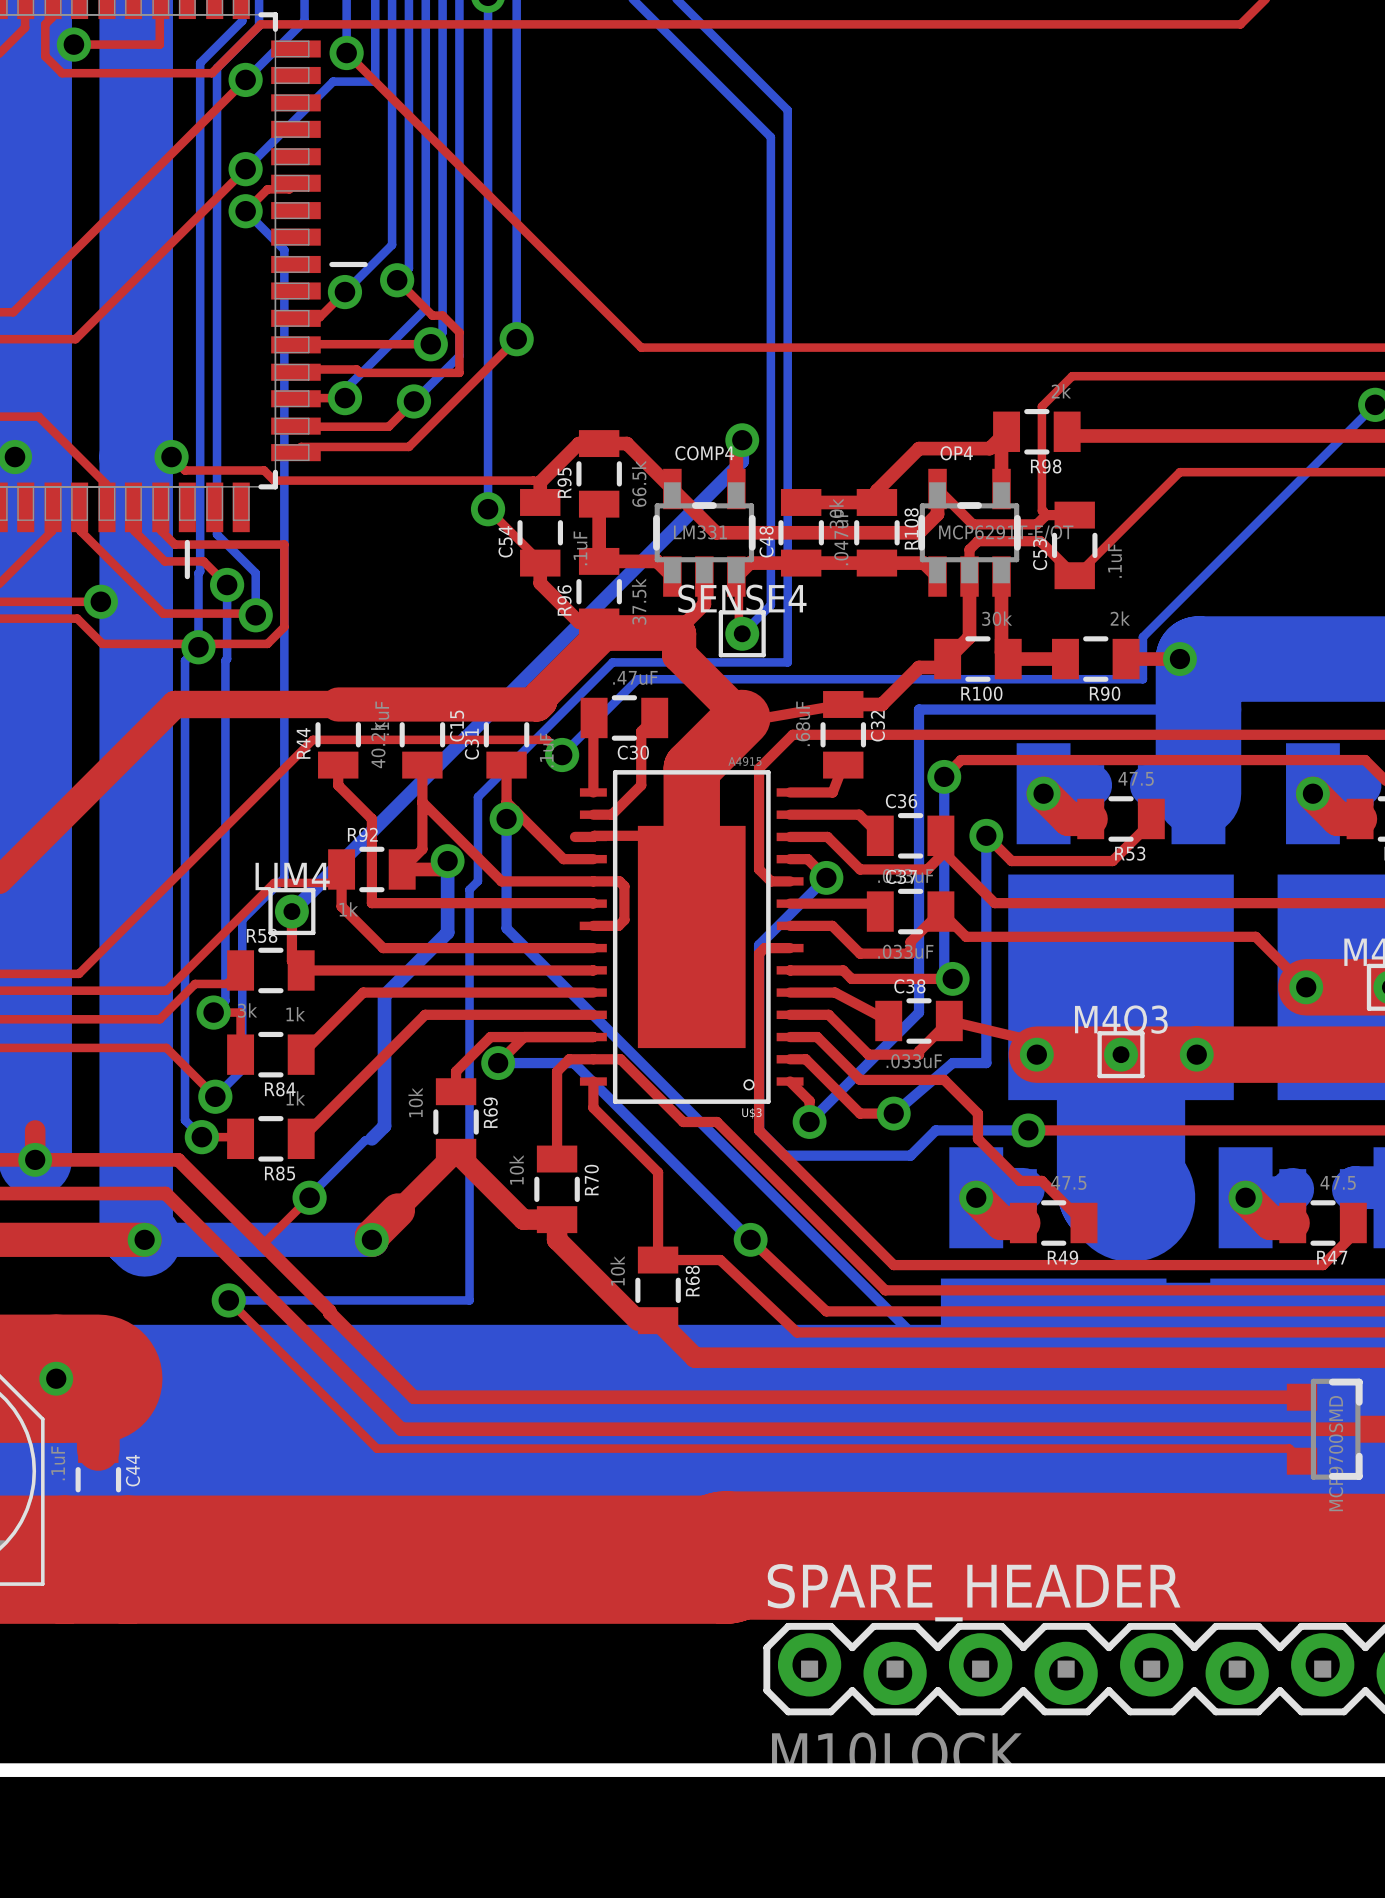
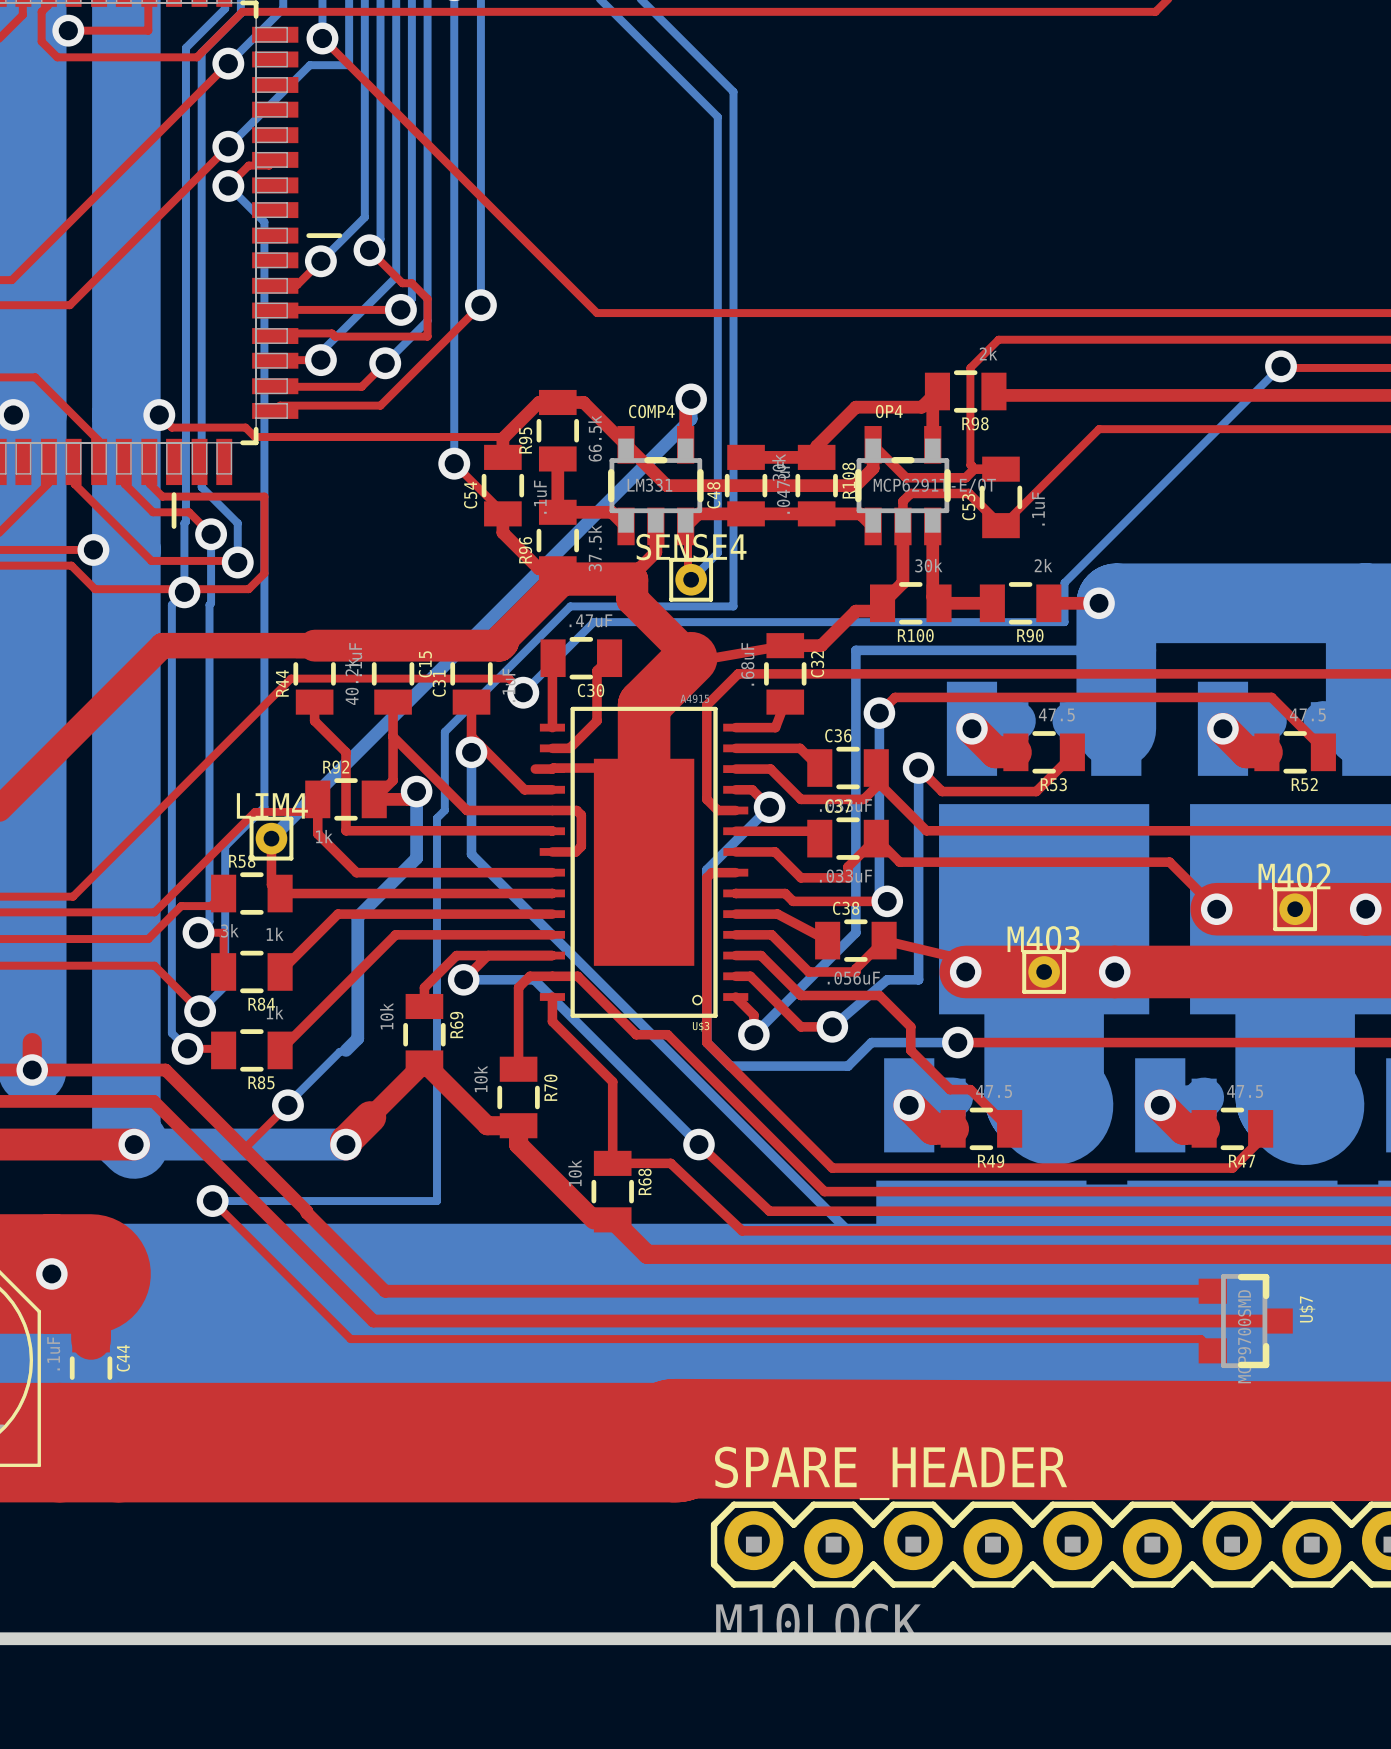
C38 value: .033uF (914, 1061) -> .056uF (853, 978)

